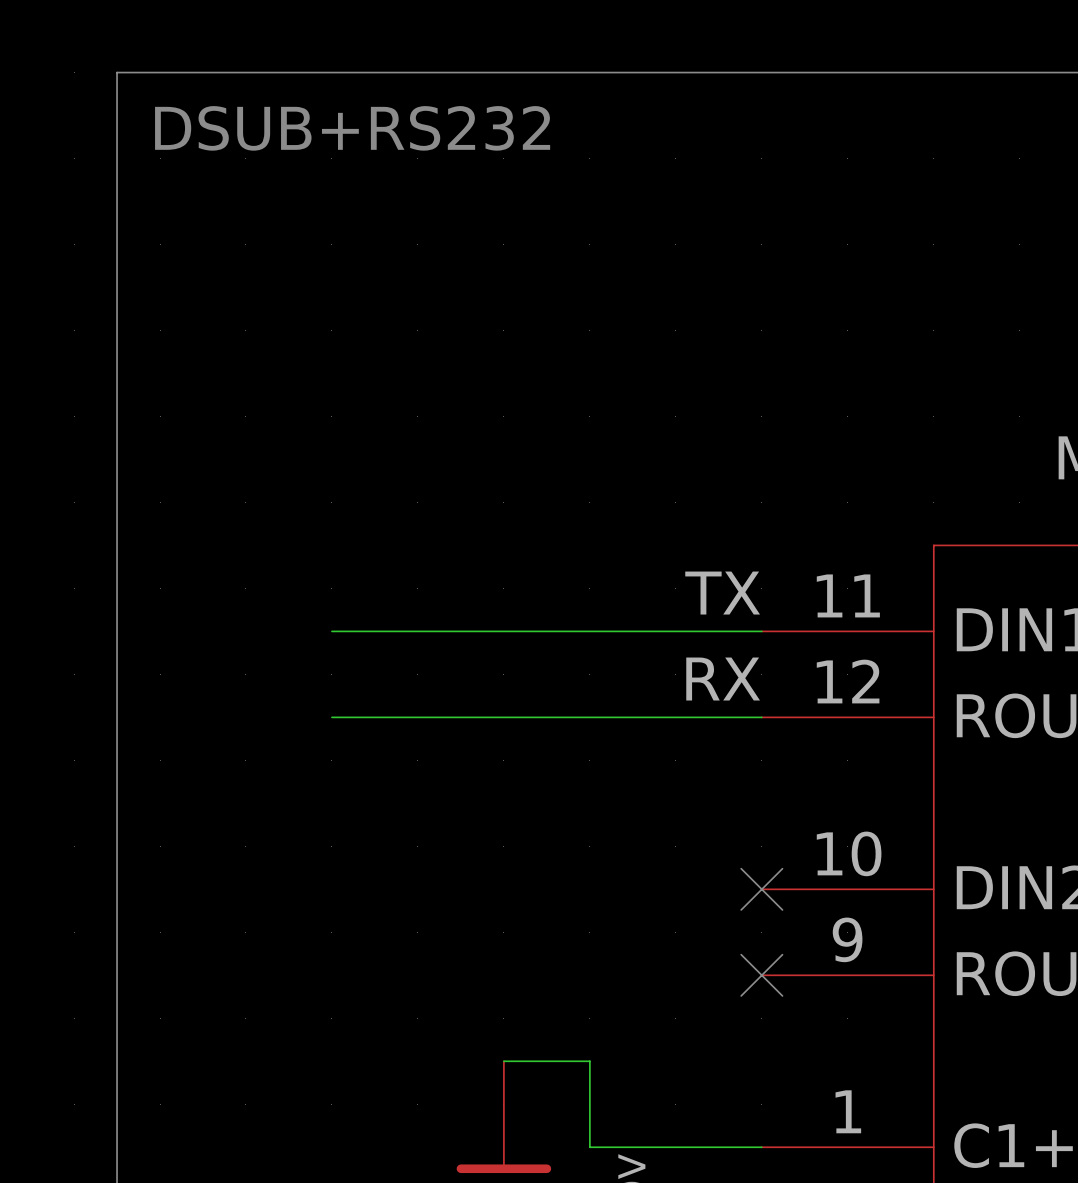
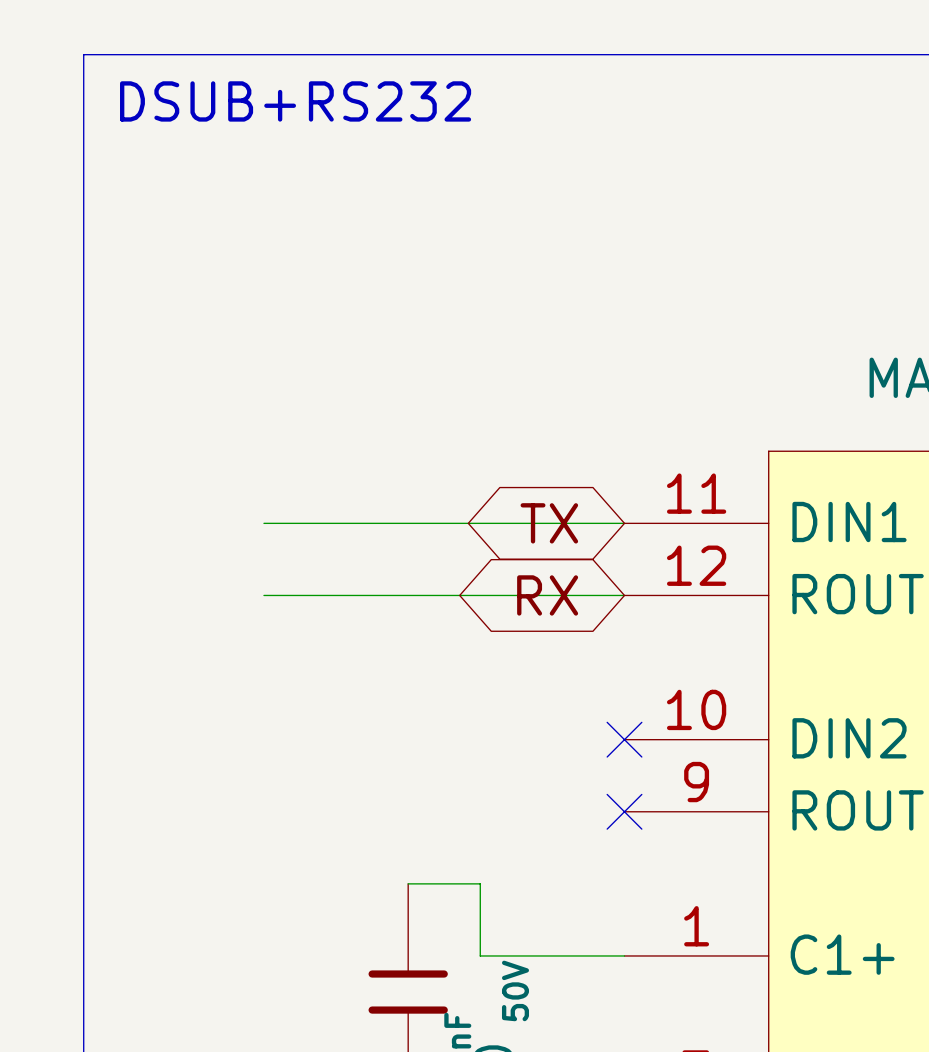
label: TX (722, 593) -> none
global label: none -> TX (549, 523)
label: RX (723, 679) -> none
global label: none -> RX (547, 595)

